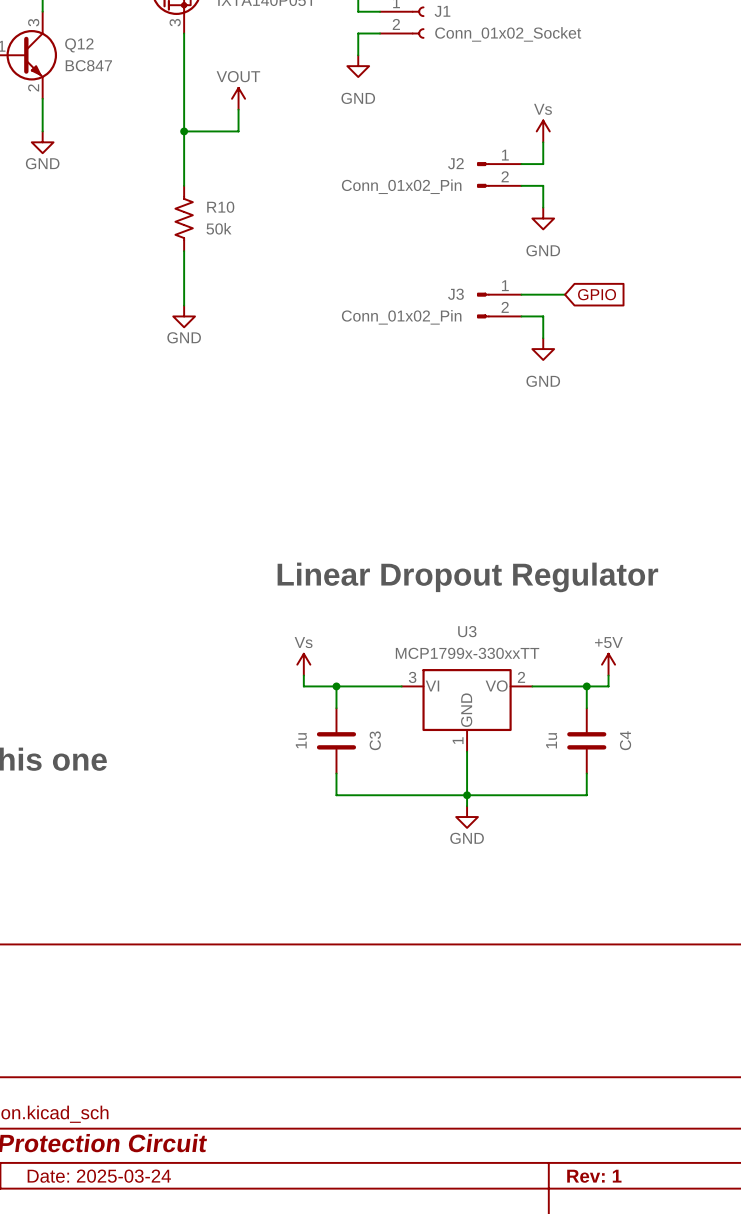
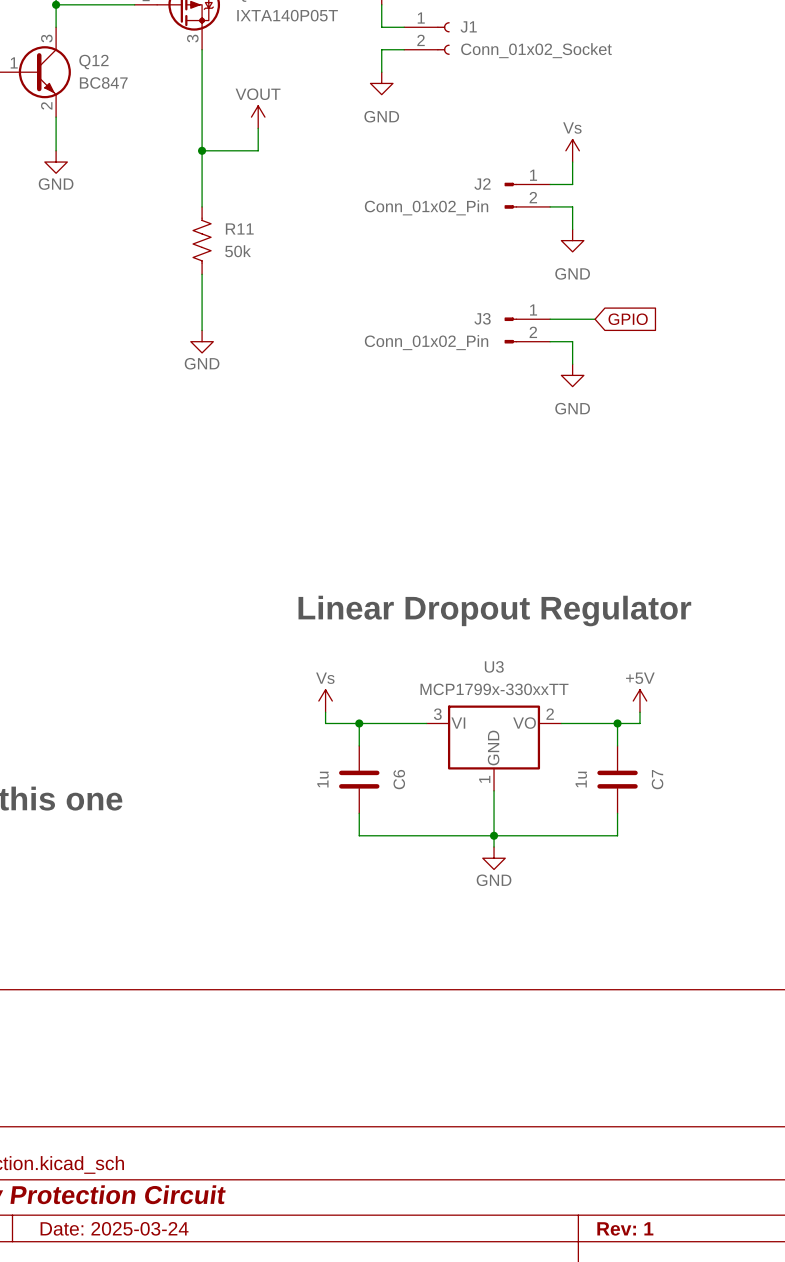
R10 name: R10 (220, 207) -> R11 (239, 228)
C3 name: C3 (375, 740) -> C6 (399, 779)
C4 name: C4 (625, 740) -> C7 (657, 779)

